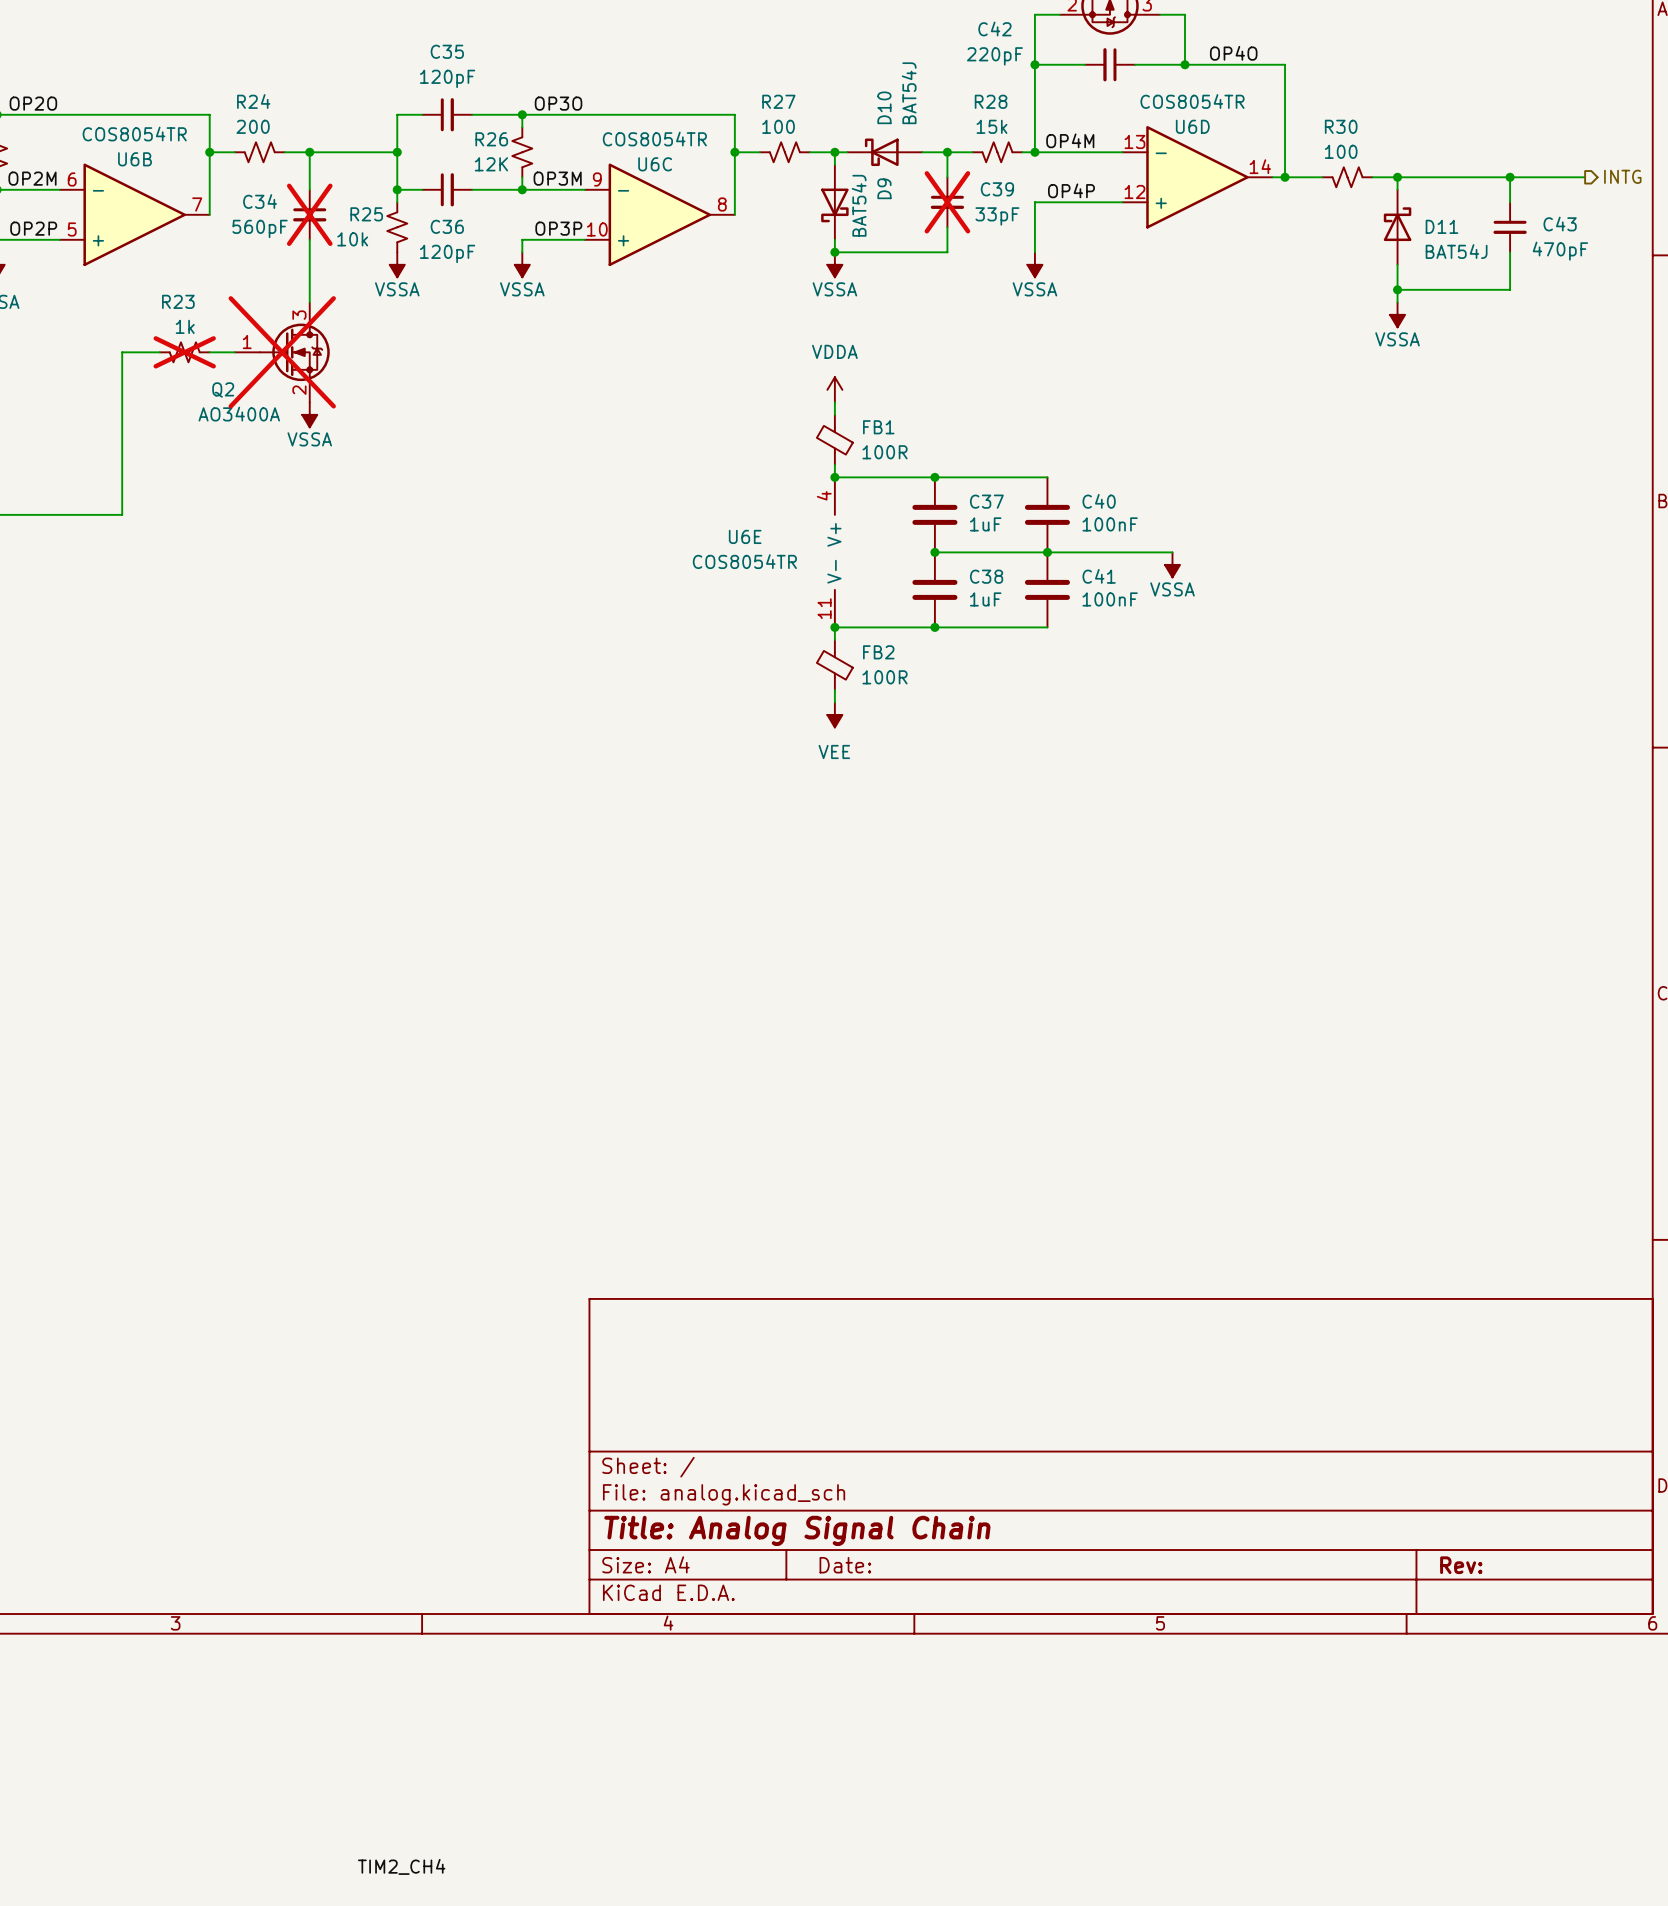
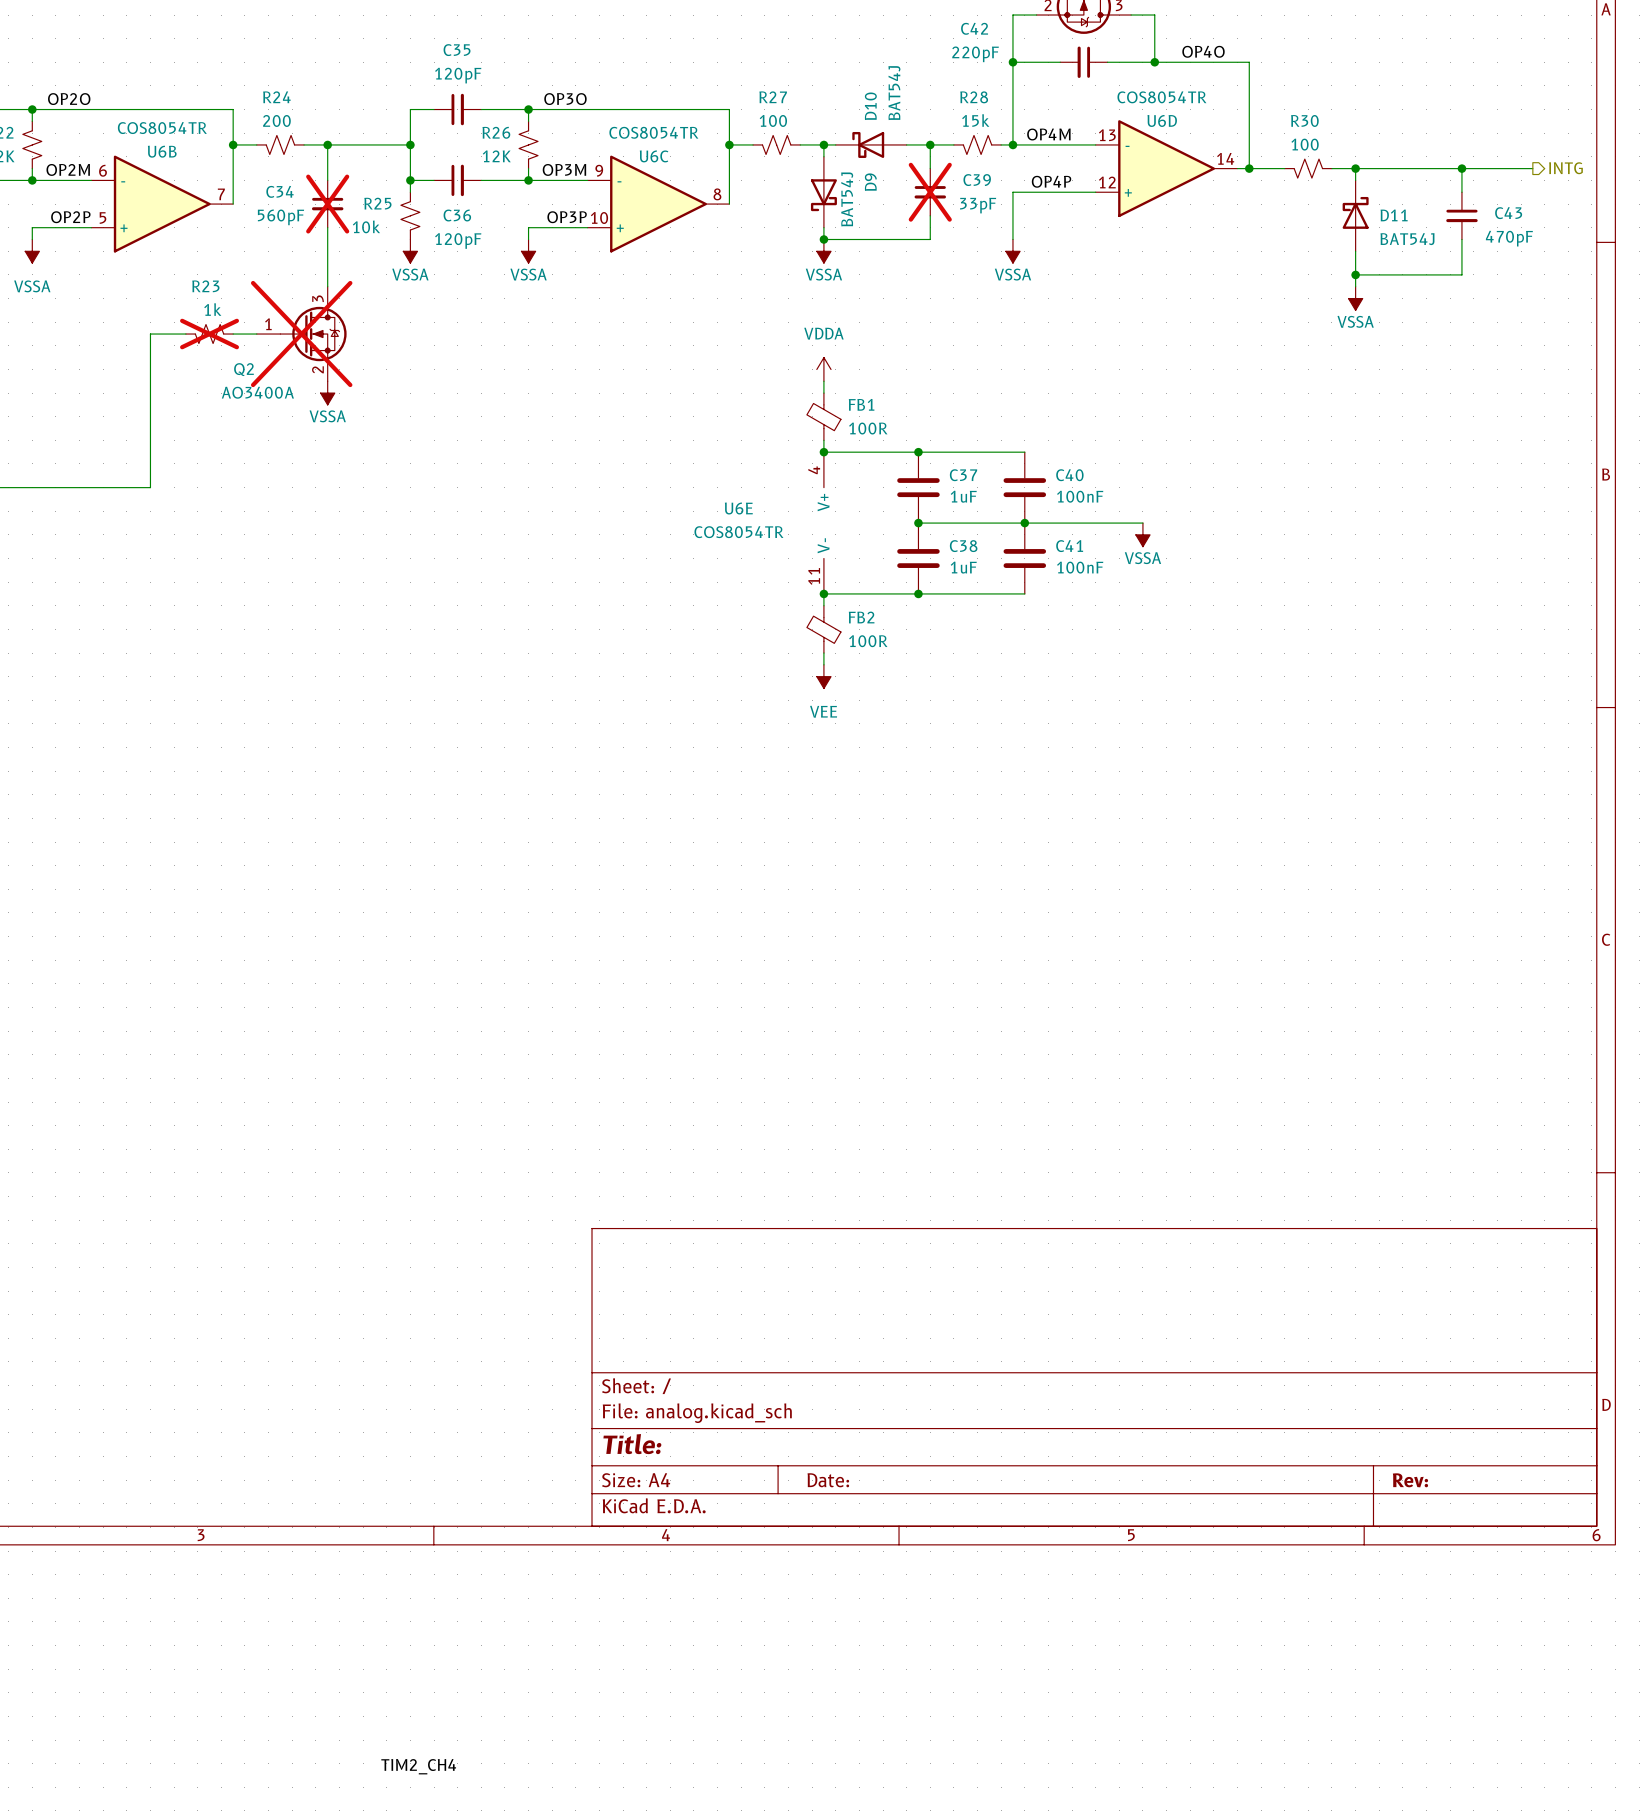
title block: Title: Analog Signal Chain (797, 1530) -> Title: (632, 1444)

